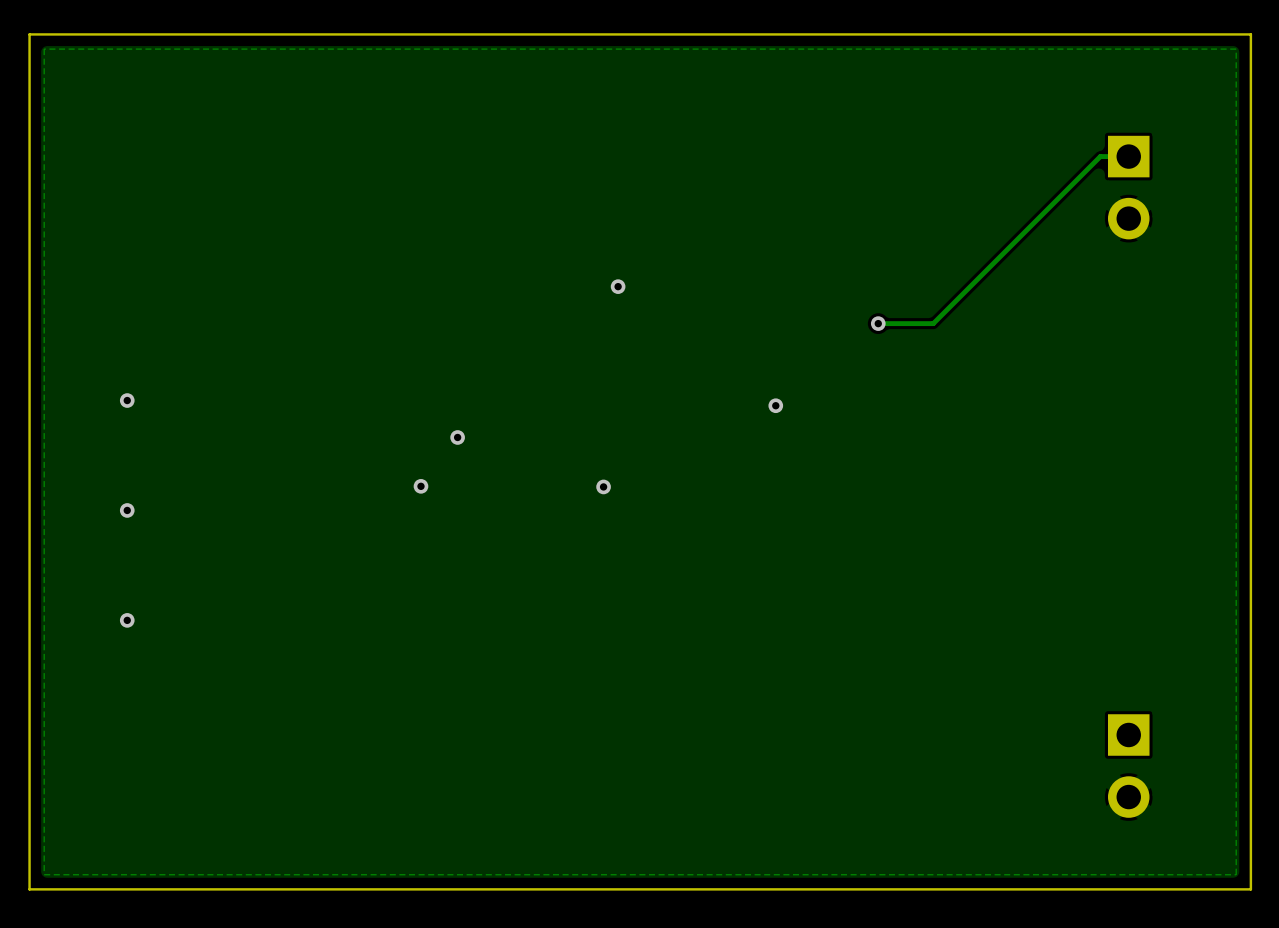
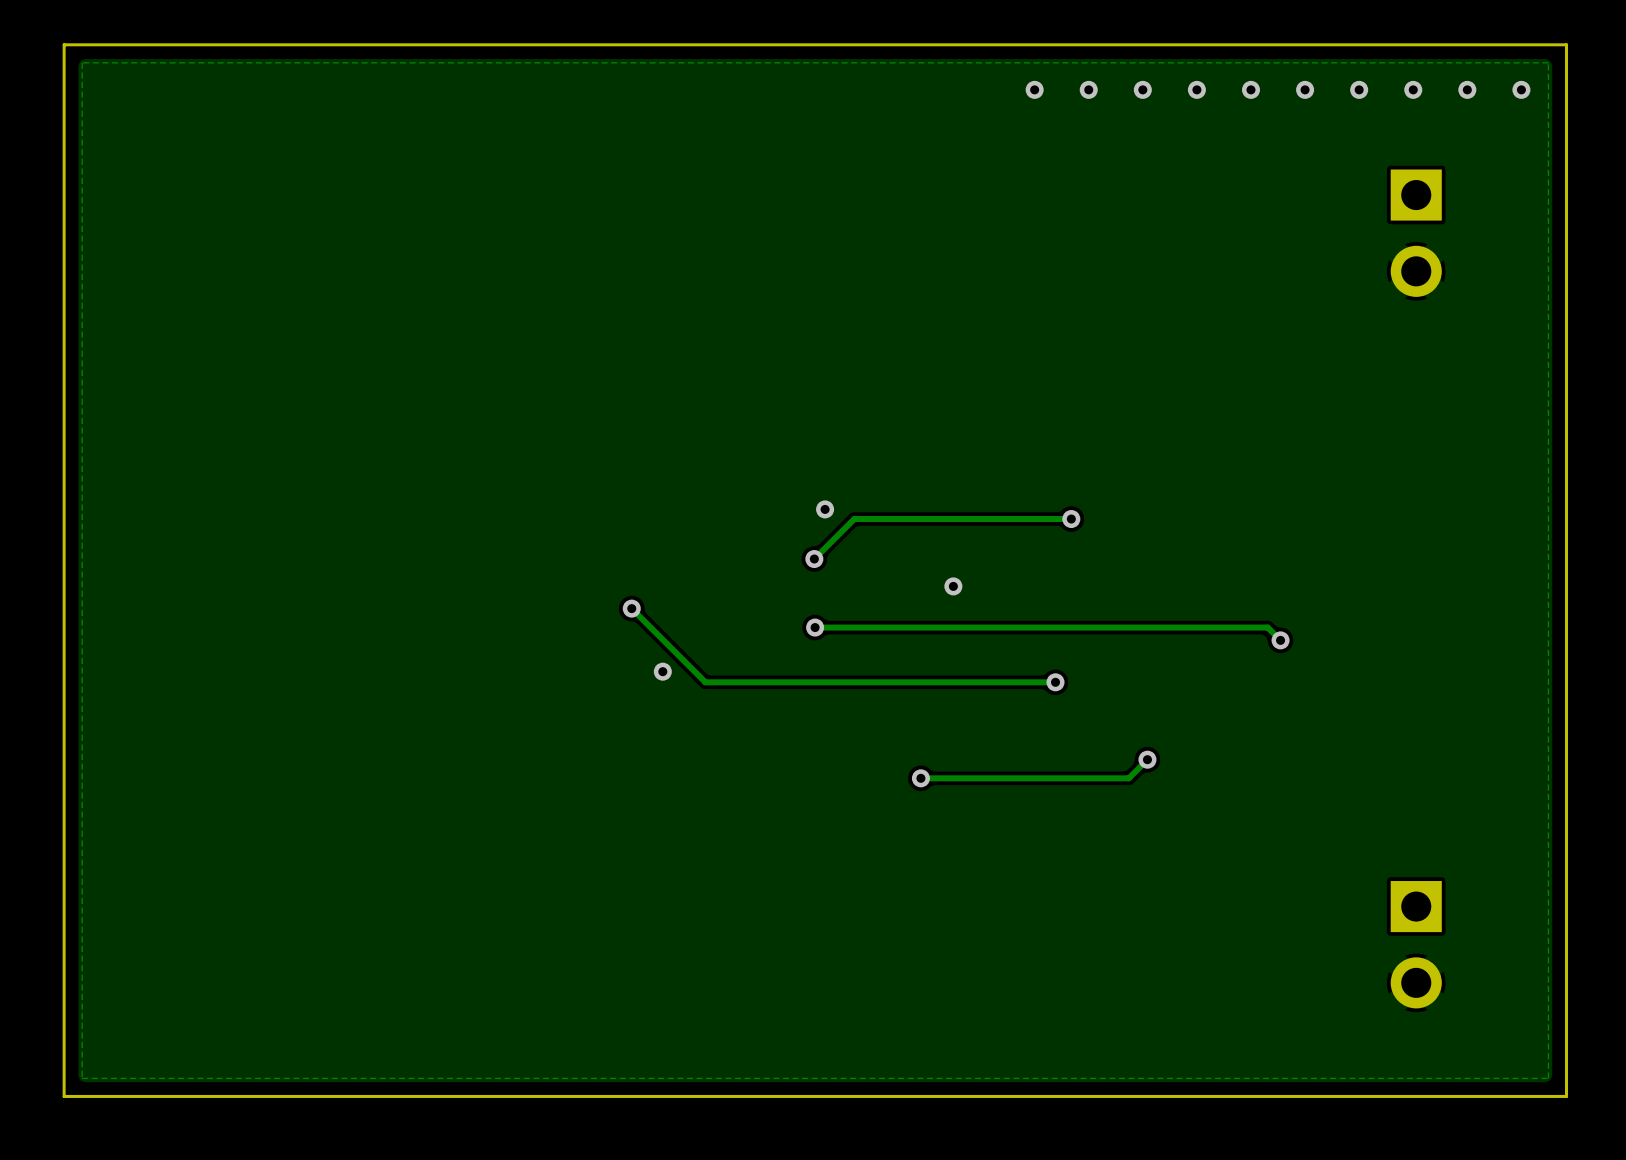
via: none -> (1034, 89)
via: none -> (1088, 89)
via: none -> (1142, 89)
via: none -> (1196, 89)
via: none -> (1251, 89)
via: none -> (1305, 89)
via: none -> (1359, 89)
via: none -> (1413, 89)
via: none -> (1467, 89)
via: none -> (1521, 89)
track: (1128, 156) (1100, 156) (933, 323) (878, 323) -> none
via: (618, 286) -> none
via: (878, 323) -> none
via: (127, 400) -> none
via: (775, 405) -> none
via: none -> (825, 509)
track: none -> (1071, 519) (854, 519) (814, 559)
via: none -> (1071, 519)
via: (457, 437) -> none
via: none -> (814, 559)
via: none -> (953, 586)
via: (420, 486) -> none
via: (603, 486) -> none
track: none -> (631, 608) (705, 682) (1055, 682)
via: none -> (631, 608)
track: none -> (815, 627) (1267, 627) (1280, 640)
via: none -> (815, 627)
via: (127, 510) -> none
via: none -> (1280, 640)
via: none -> (662, 671)
via: none -> (1055, 682)
track: none -> (1147, 759) (1128, 778) (920, 778)
via: none -> (1147, 759)
via: (127, 620) -> none
via: none -> (920, 778)

